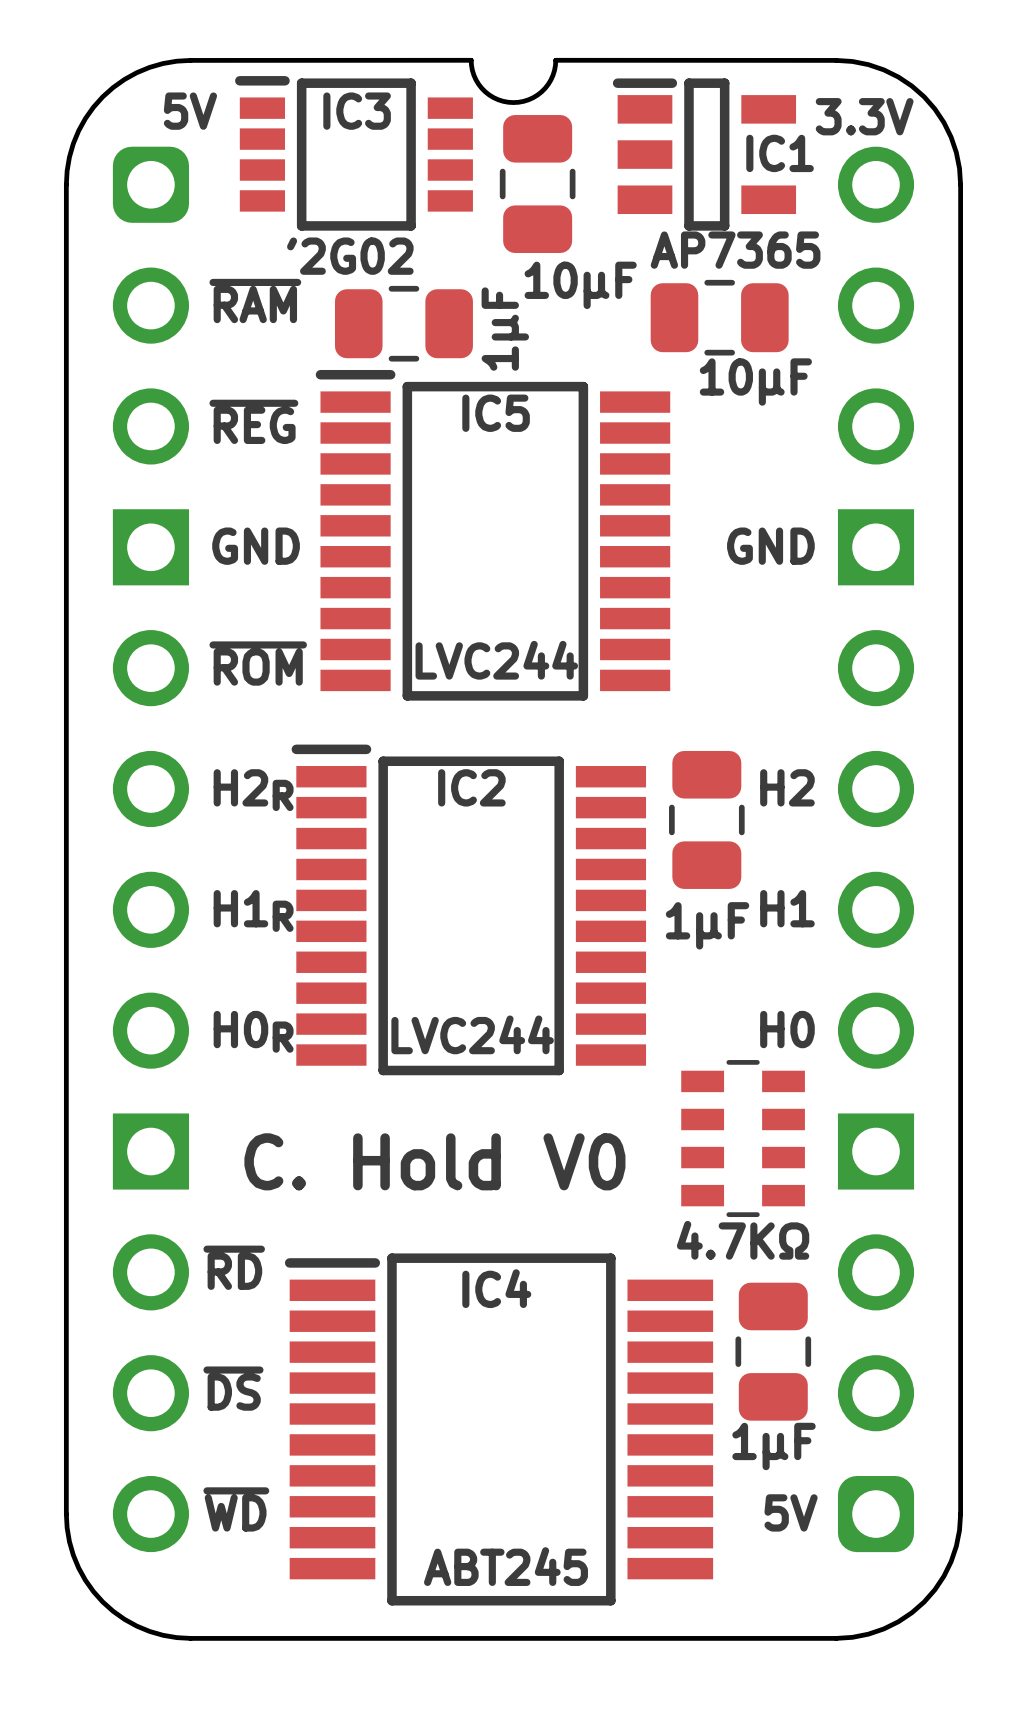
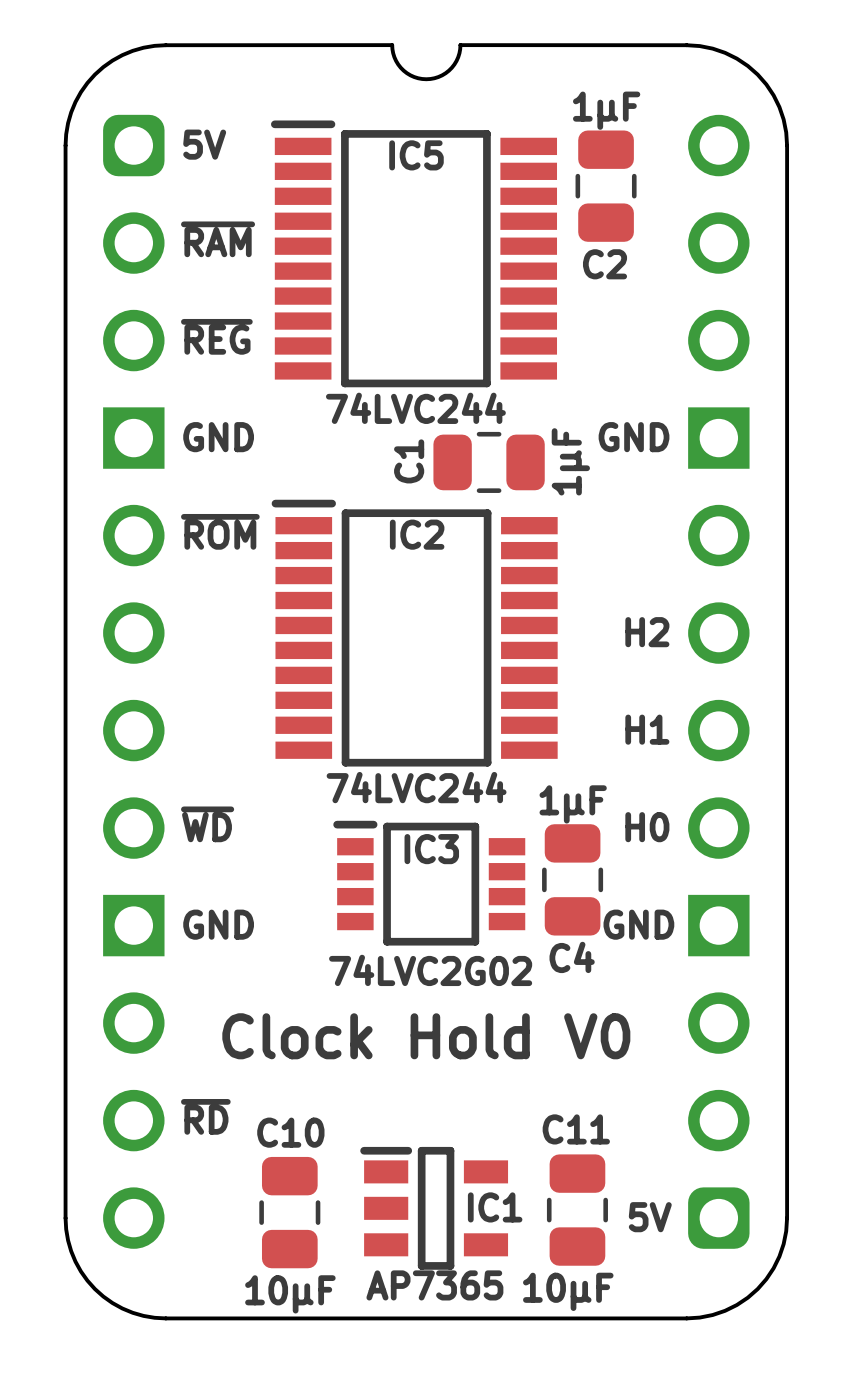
text position: 5V (190, 111) -> 5V (204, 144)
text: 3.3V (864, 116) -> none
IC3 position: (354, 153) -> (429, 883)
IC1 position: (704, 154) -> (434, 1208)
part: 10µF (537, 184) -> none
C2: none -> 1μF (606, 186)
IC1 text position: AP7365 (735, 250) -> AP7365 (434, 1285)
IC3 text: '2G02 (350, 256) -> none
part: 10µF (719, 317) -> none
part: 1μF (403, 323) -> none
IC5 text: none -> 74LVC244 (415, 408)
IC5 position: (492, 535) -> (414, 253)
C1: none -> 1μF (489, 462)
IC5 text: LVC244 (496, 660) -> none
text: H2R (253, 790) -> none
part: 1μF (706, 819) -> none
IC2 position: (468, 909) -> (414, 633)
text: H1R (253, 910) -> none
IC2 text: none -> 74LVC244 (416, 787)
text: H0R (253, 1031) -> ~{WD} (207, 824)
IC2 text: LVC244 (472, 1034) -> none
C4: none -> 1μF (572, 879)
part: (743, 1138) -> none
text: none -> GND (218, 924)
text: none -> GND (638, 924)
text: C. Hold V0 (434, 1161) -> none
IC3 text: none -> 74LVC2G02 (430, 970)
text position: ~{RD} (234, 1267) -> ~{RD} (205, 1116)
text: none -> Clock Hold V0 (426, 1036)
part: 1μF (773, 1351) -> none
text: ~{DS} (233, 1388) -> none
IC4: (499, 1429) -> none
C11: none -> 10µF (577, 1210)
C10: none -> 10µF (289, 1212)
text: ~{WD} (236, 1509) -> none

